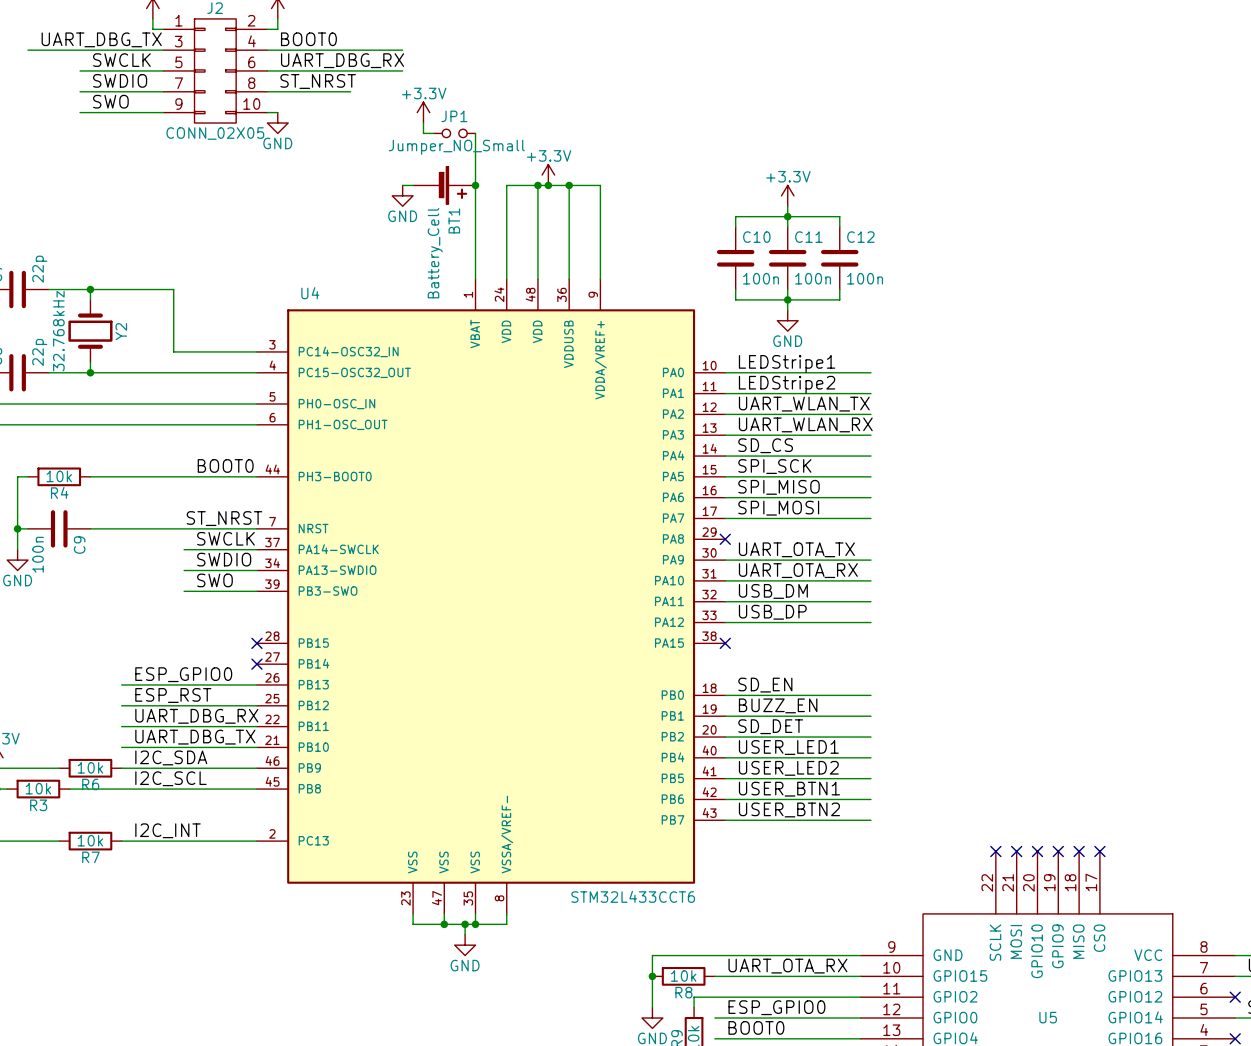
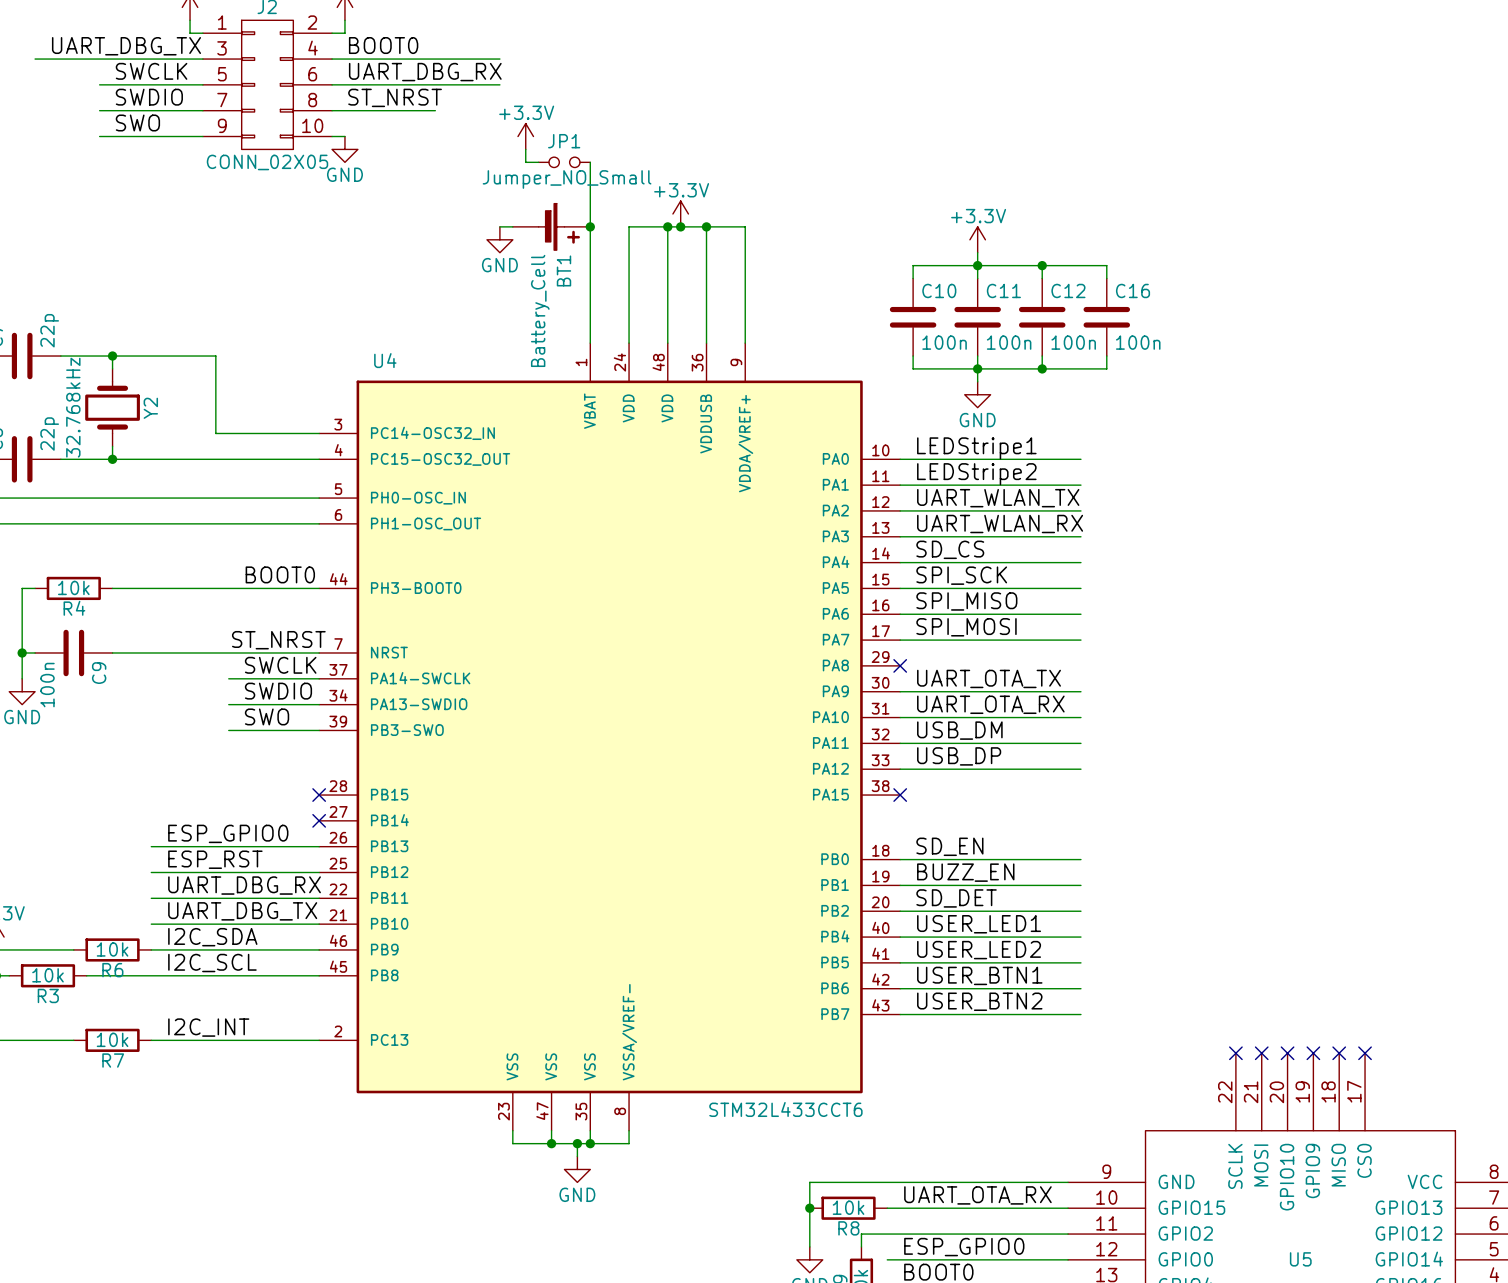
wire: none -> (1042, 265) (1106, 265) (1106, 278)
junction: none -> (1042, 265)
C16: none -> 100n (1106, 317)
wire: none -> (1106, 356) (1106, 368) (1042, 368)
junction: none -> (1042, 368)

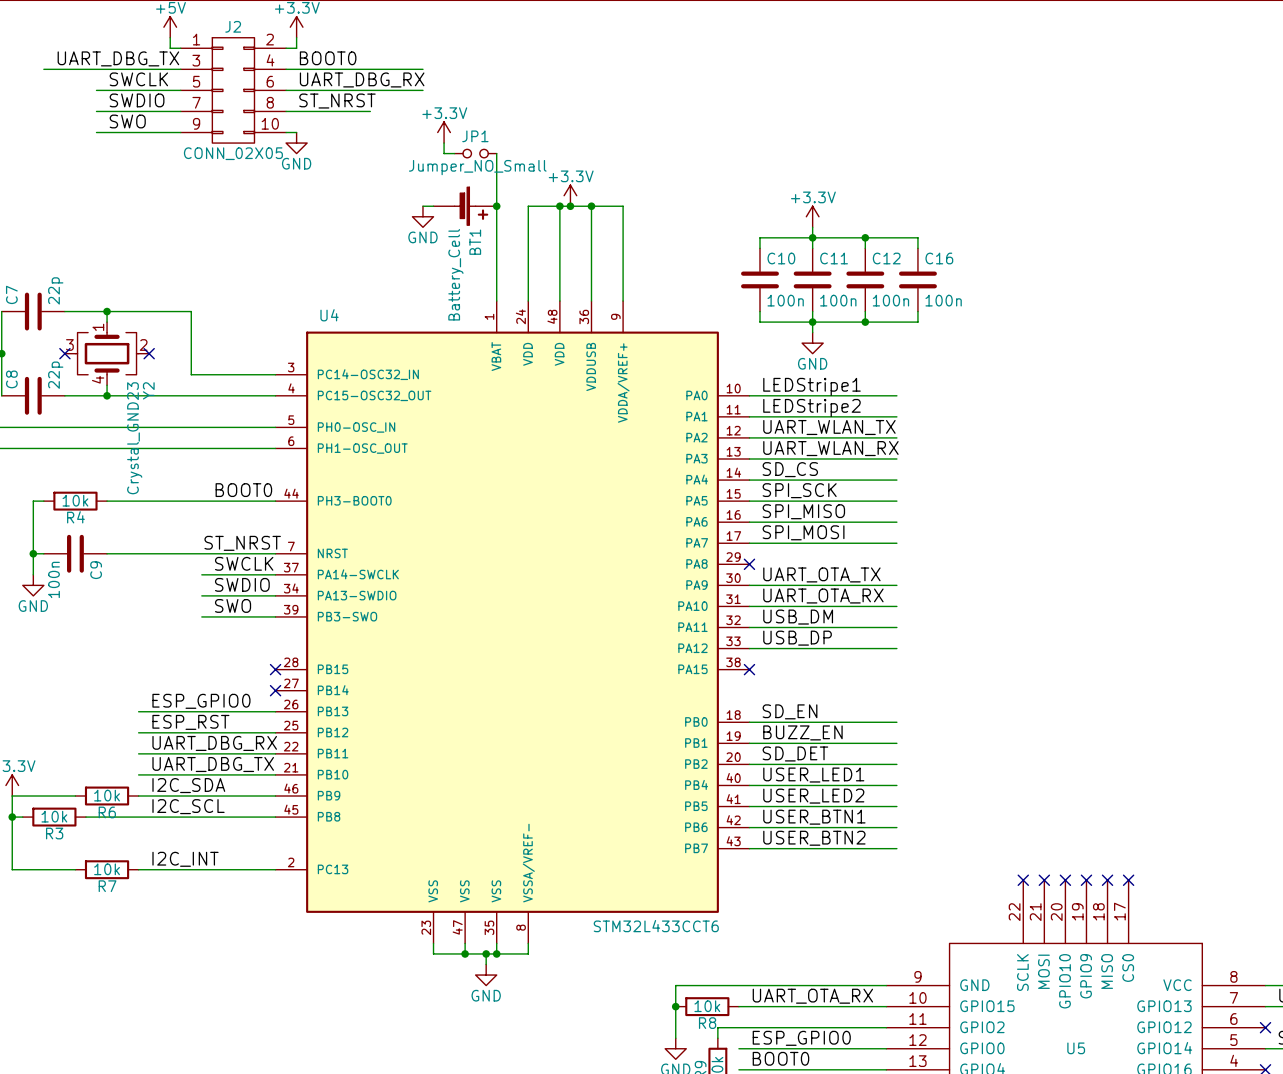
Y2 symbol: [85, 368, 140, 447] -> [64, 322, 150, 386]
no-connect mark: none -> (64, 353)
Y2 value: 32.768kHz (73, 407) -> Crystal_GND23 (134, 438)
no-connect mark: none -> (149, 353)
Y2 name position: Y2 (150, 408) -> Y2 (148, 390)

